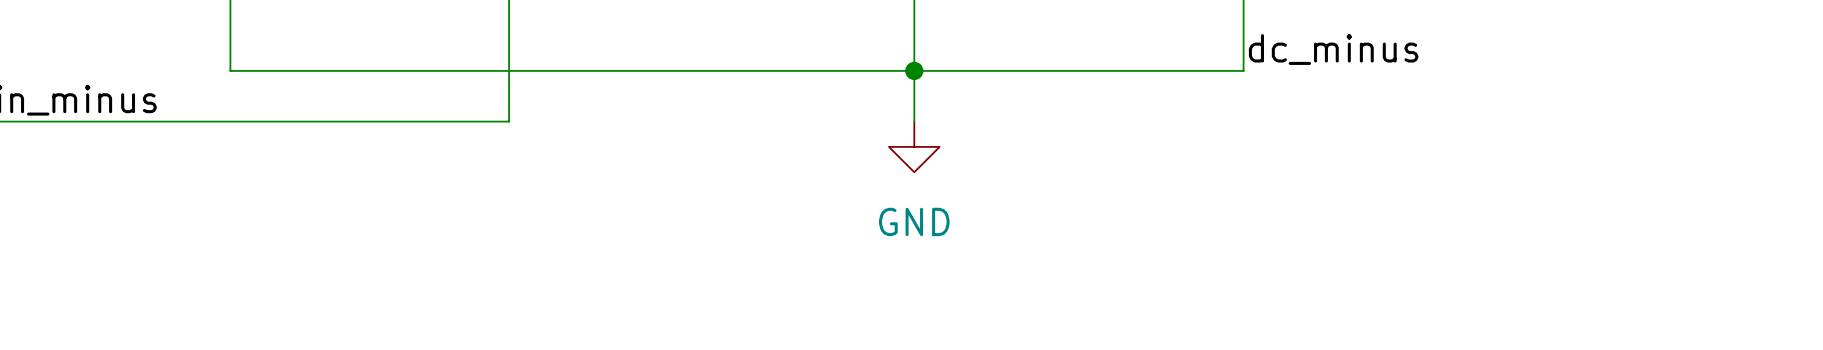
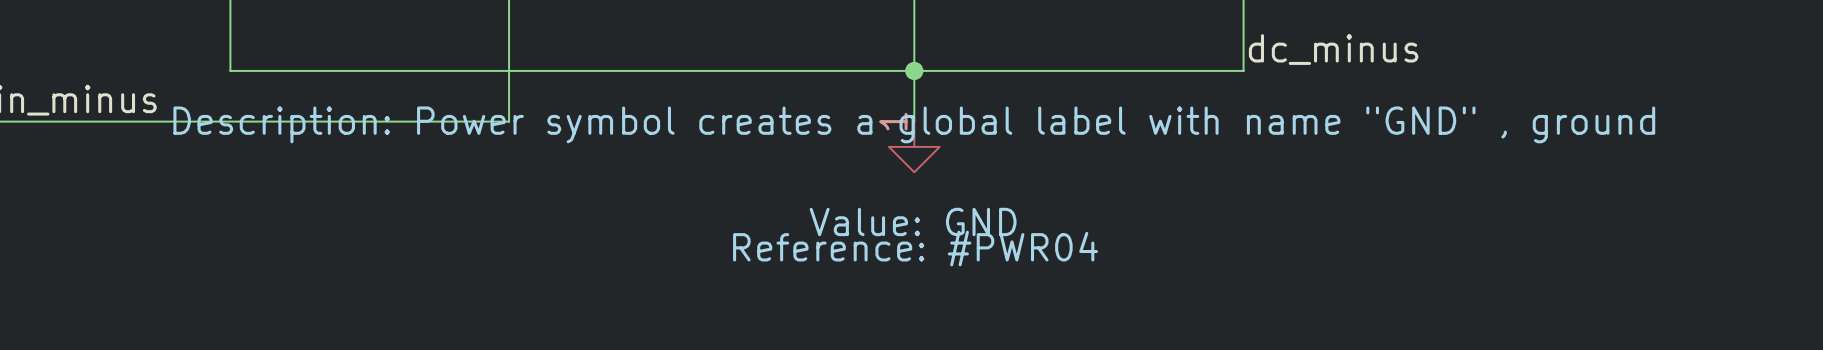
power symbol: GND (914, 146) -> Value: GND (914, 146)

